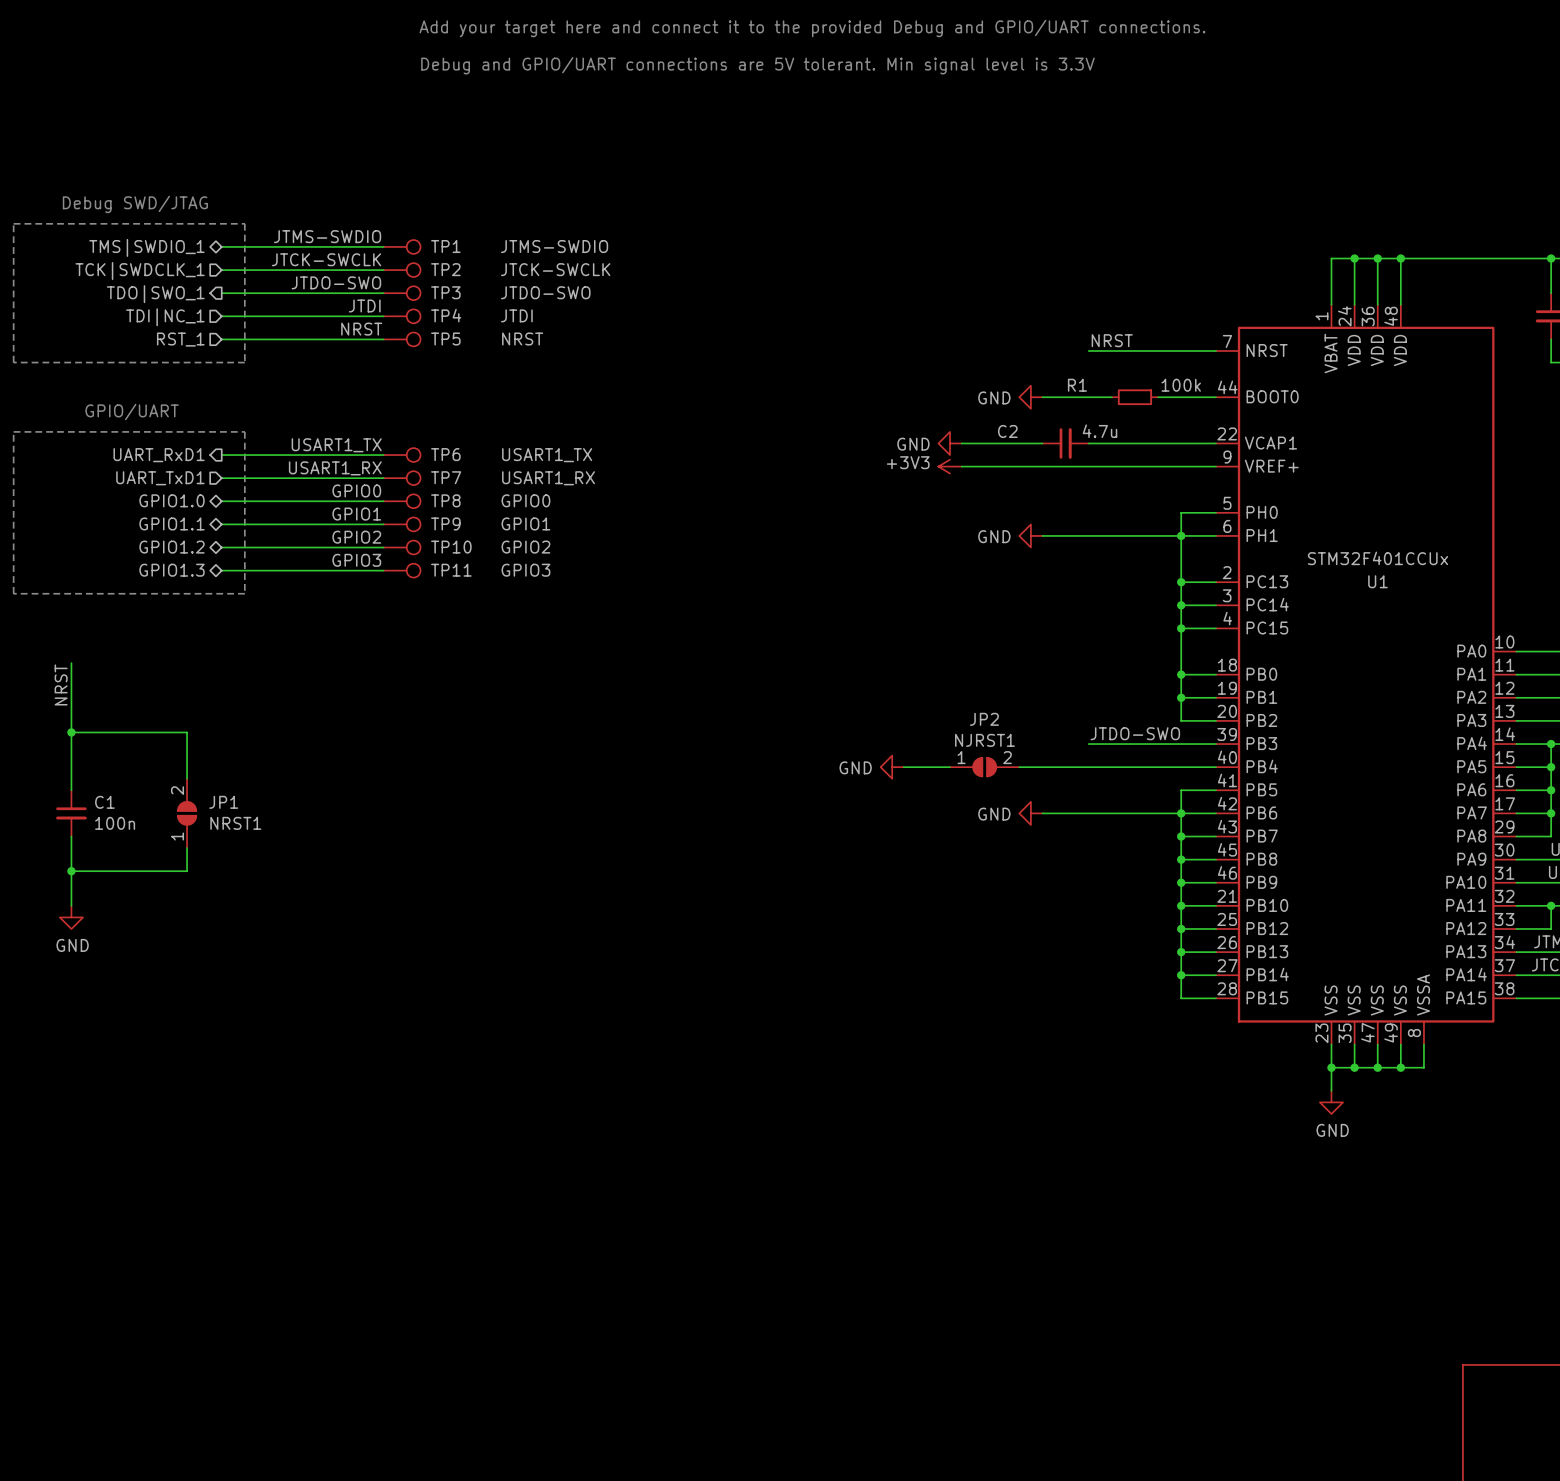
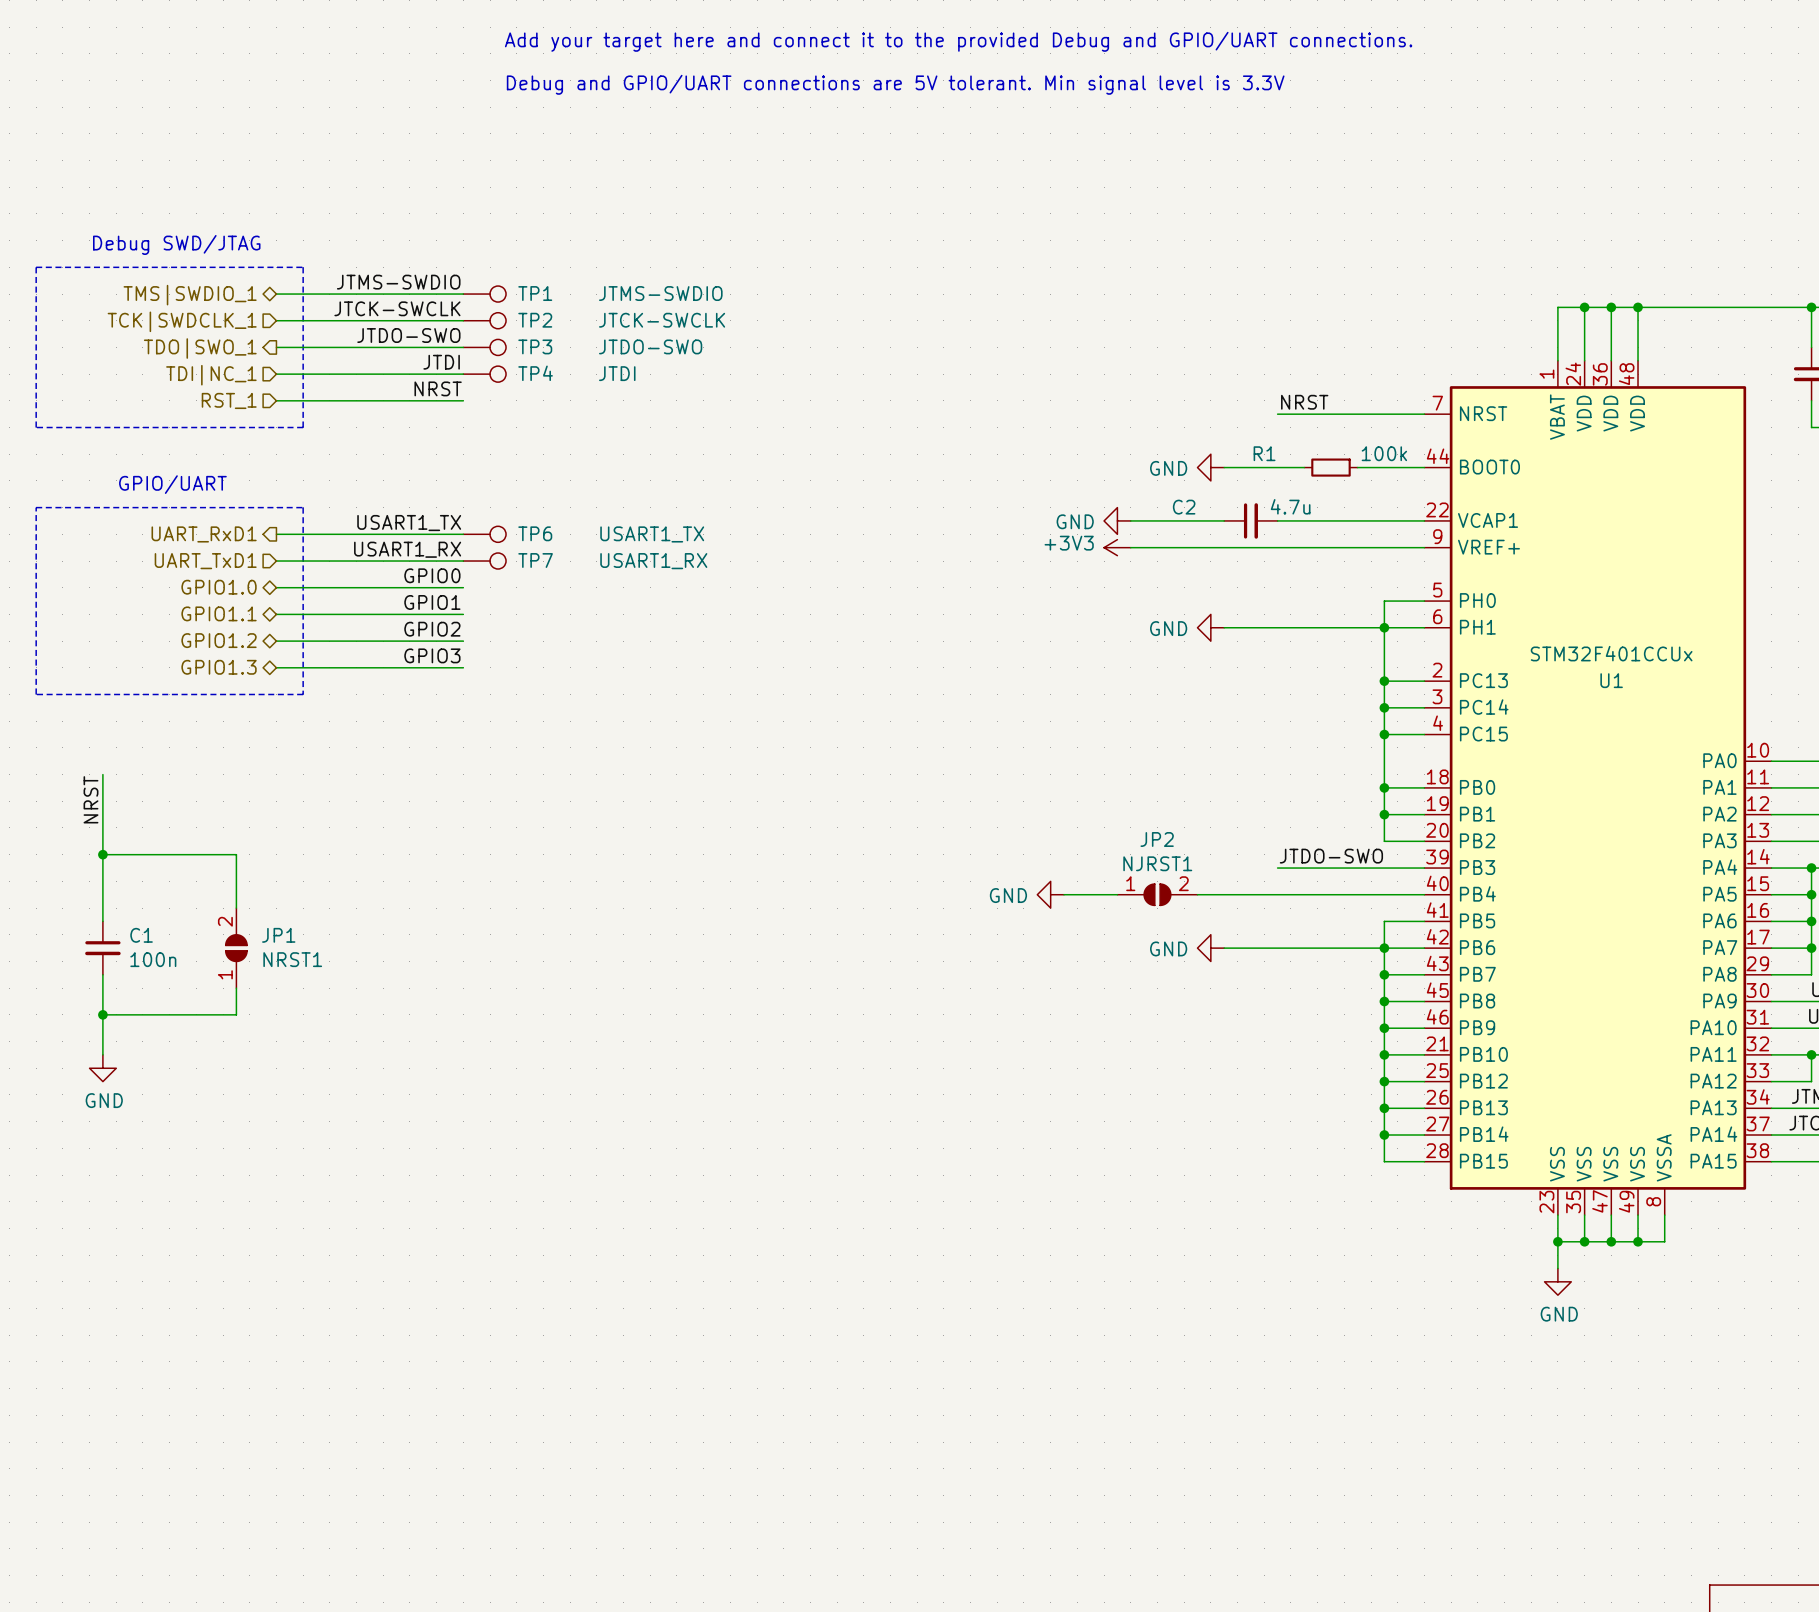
TP5: NRST (402, 339) -> none
TP8: GPIO0 (402, 501) -> none
TP9: GPIO1 (402, 524) -> none
TP10: GPIO2 (402, 547) -> none
TP11: GPIO3 (402, 570) -> none

